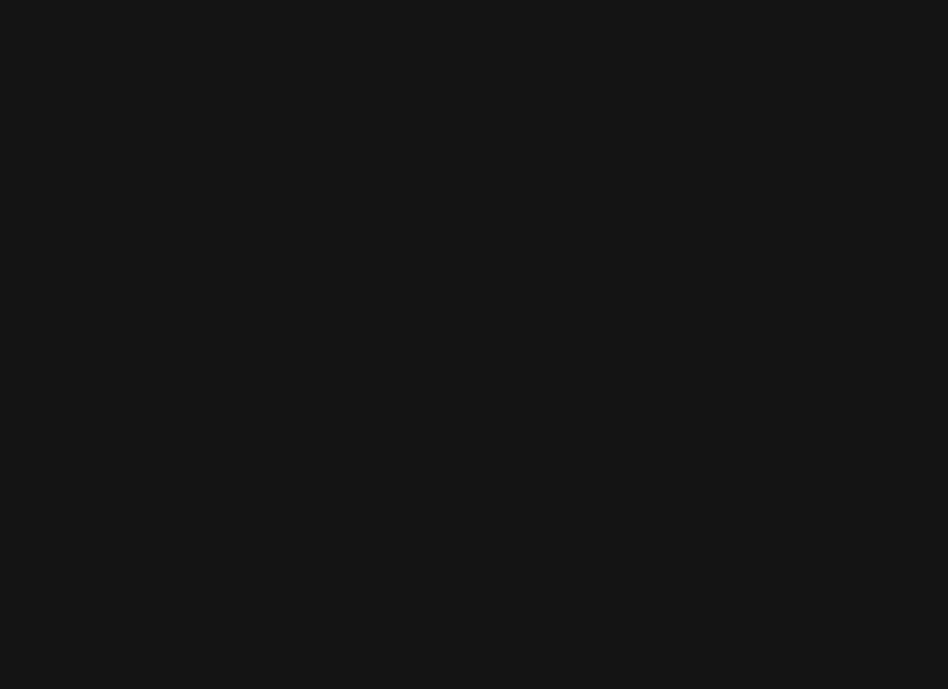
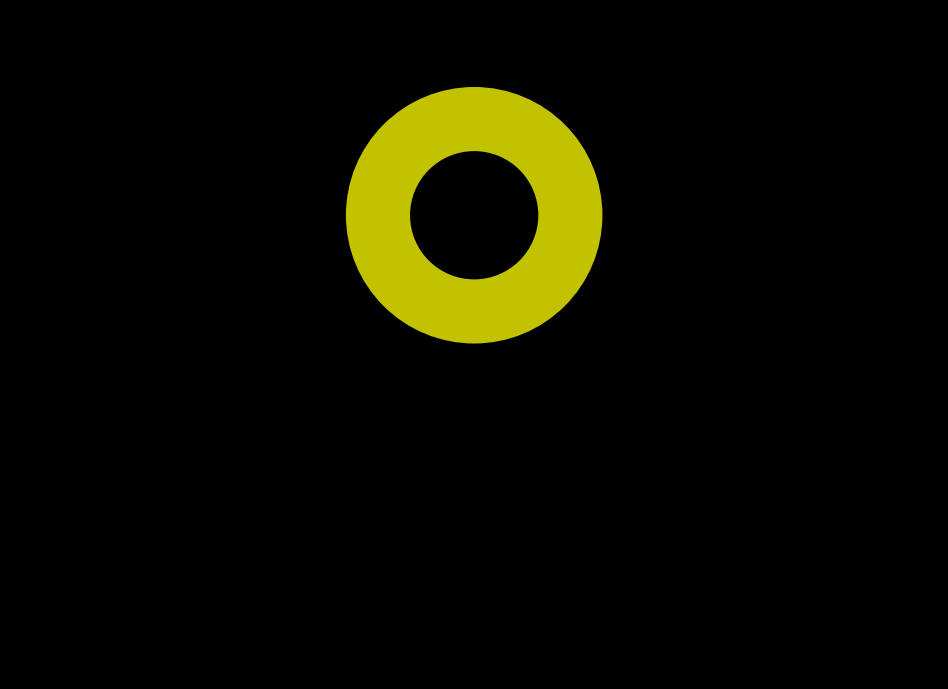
part: none -> (474, 215)

